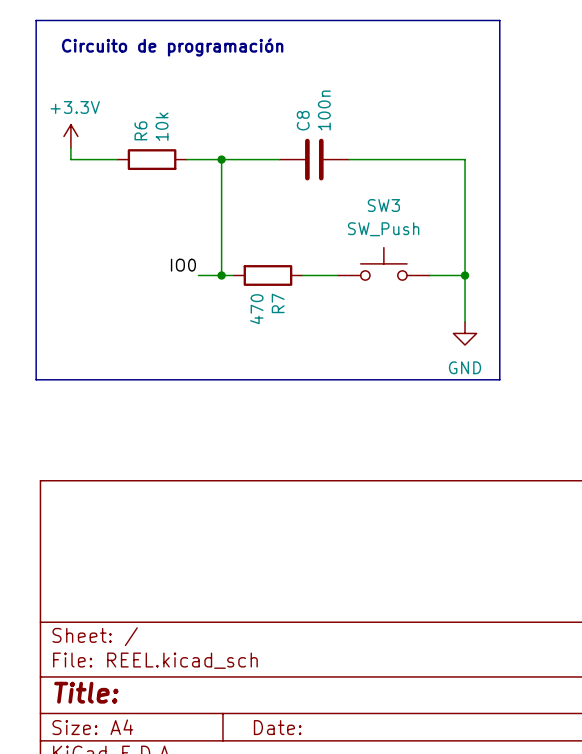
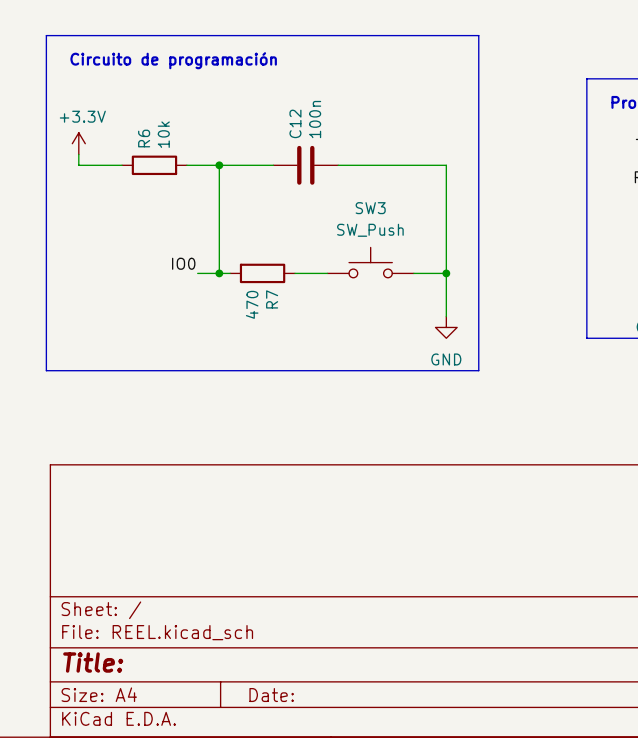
C8 name: C8 (303, 120) -> C12 (295, 123)

